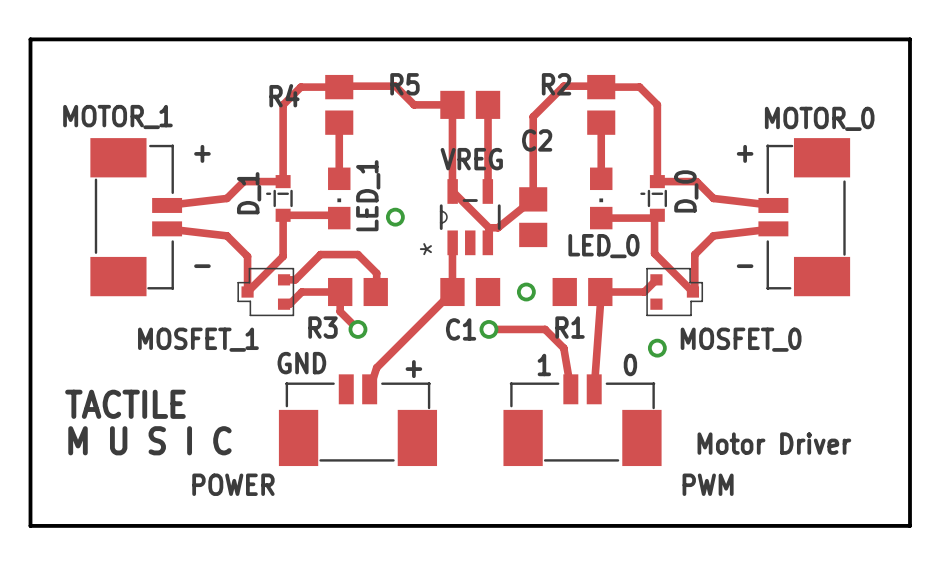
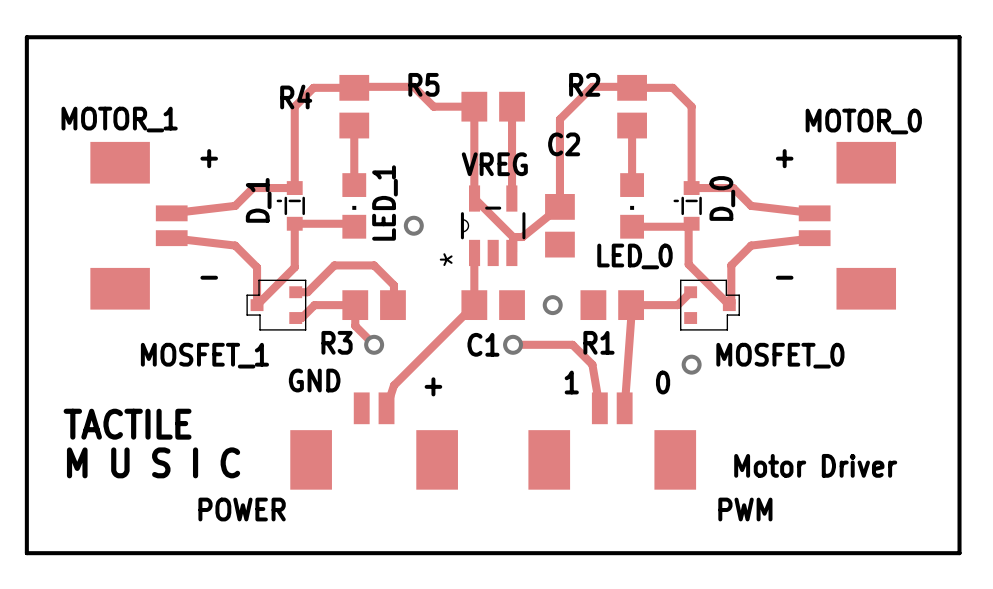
MOTOR_1 footprint: [90, 138, 183, 297] -> [90, 141, 188, 310]
MOTOR_0 footprint: [758, 138, 851, 297] -> [798, 141, 897, 310]
POWER footprint: [278, 374, 438, 467] -> [290, 392, 458, 490]
PWM footprint: [503, 374, 662, 467] -> [528, 392, 697, 490]

